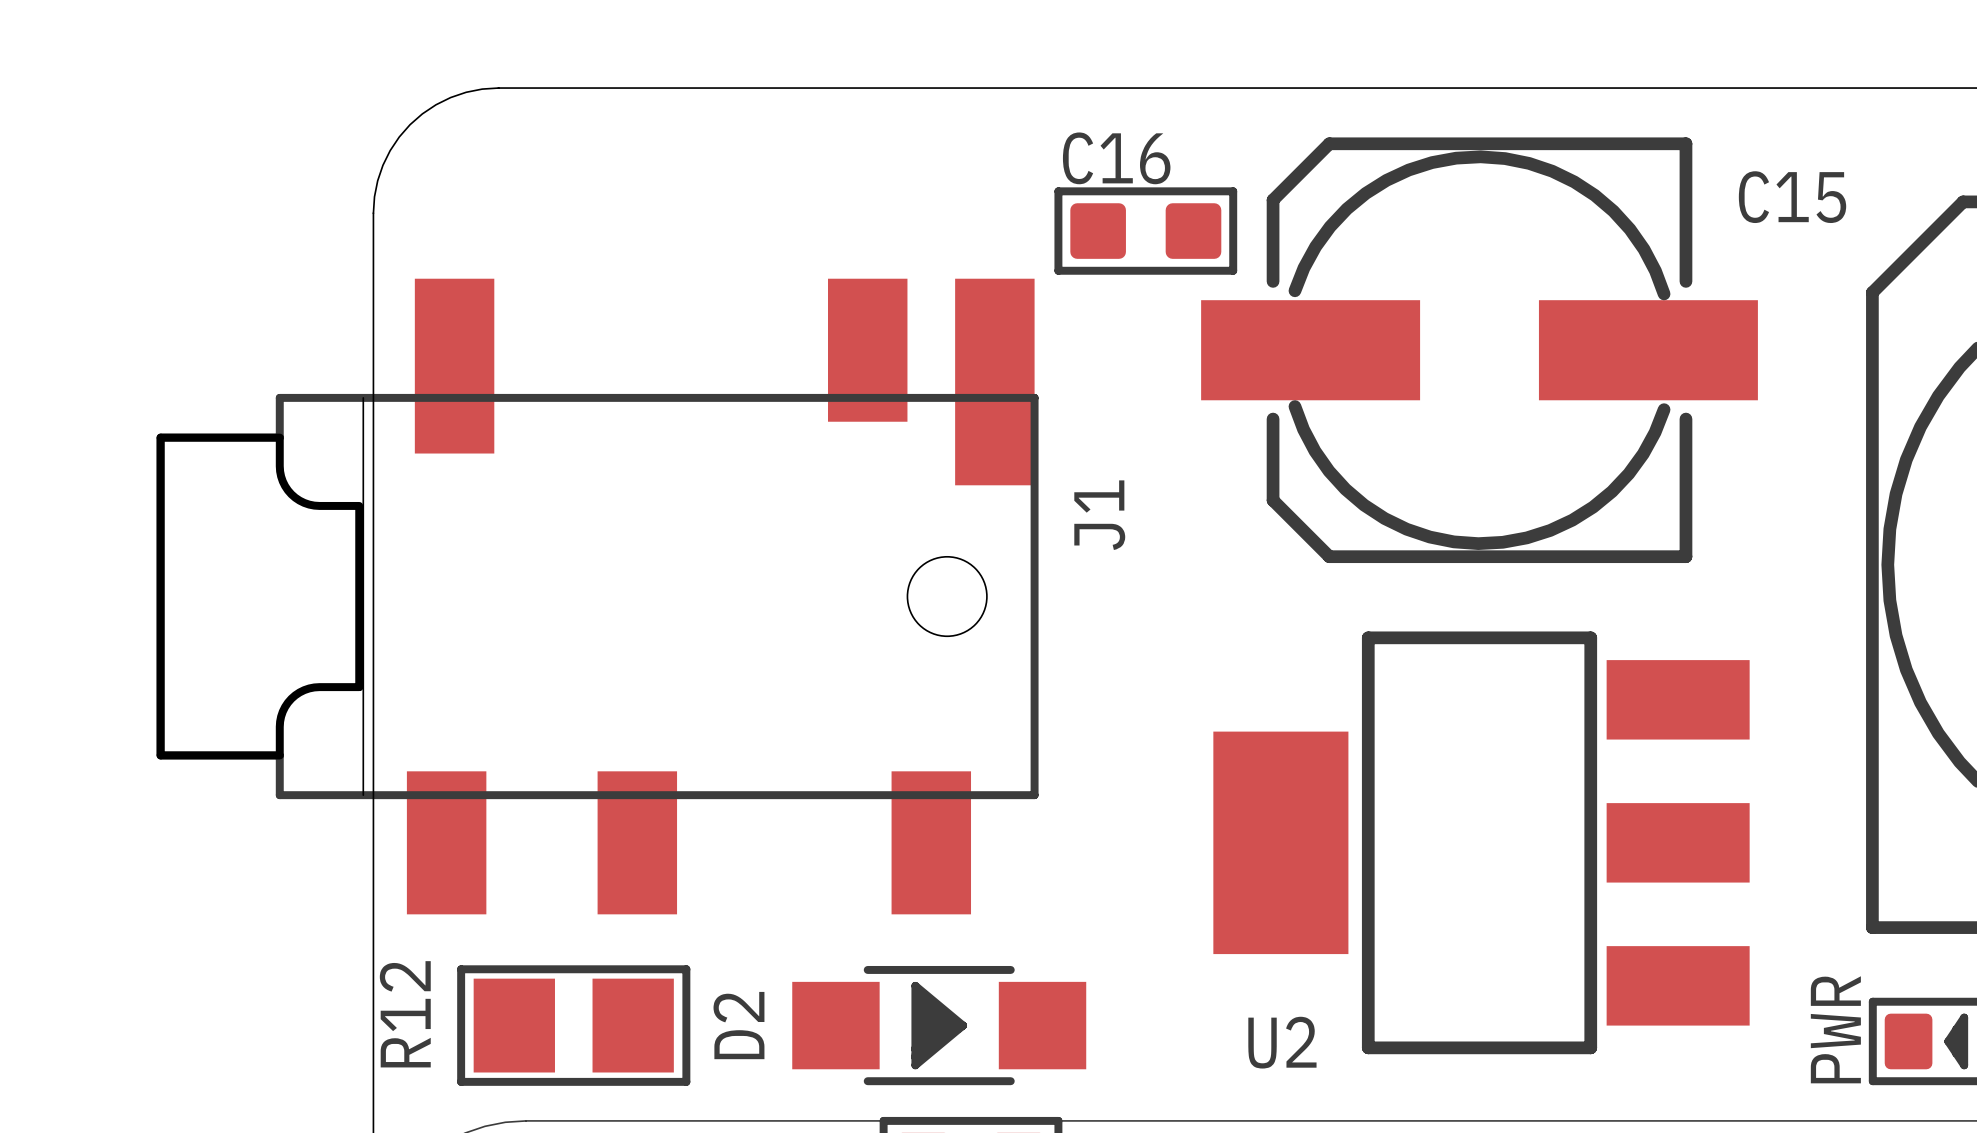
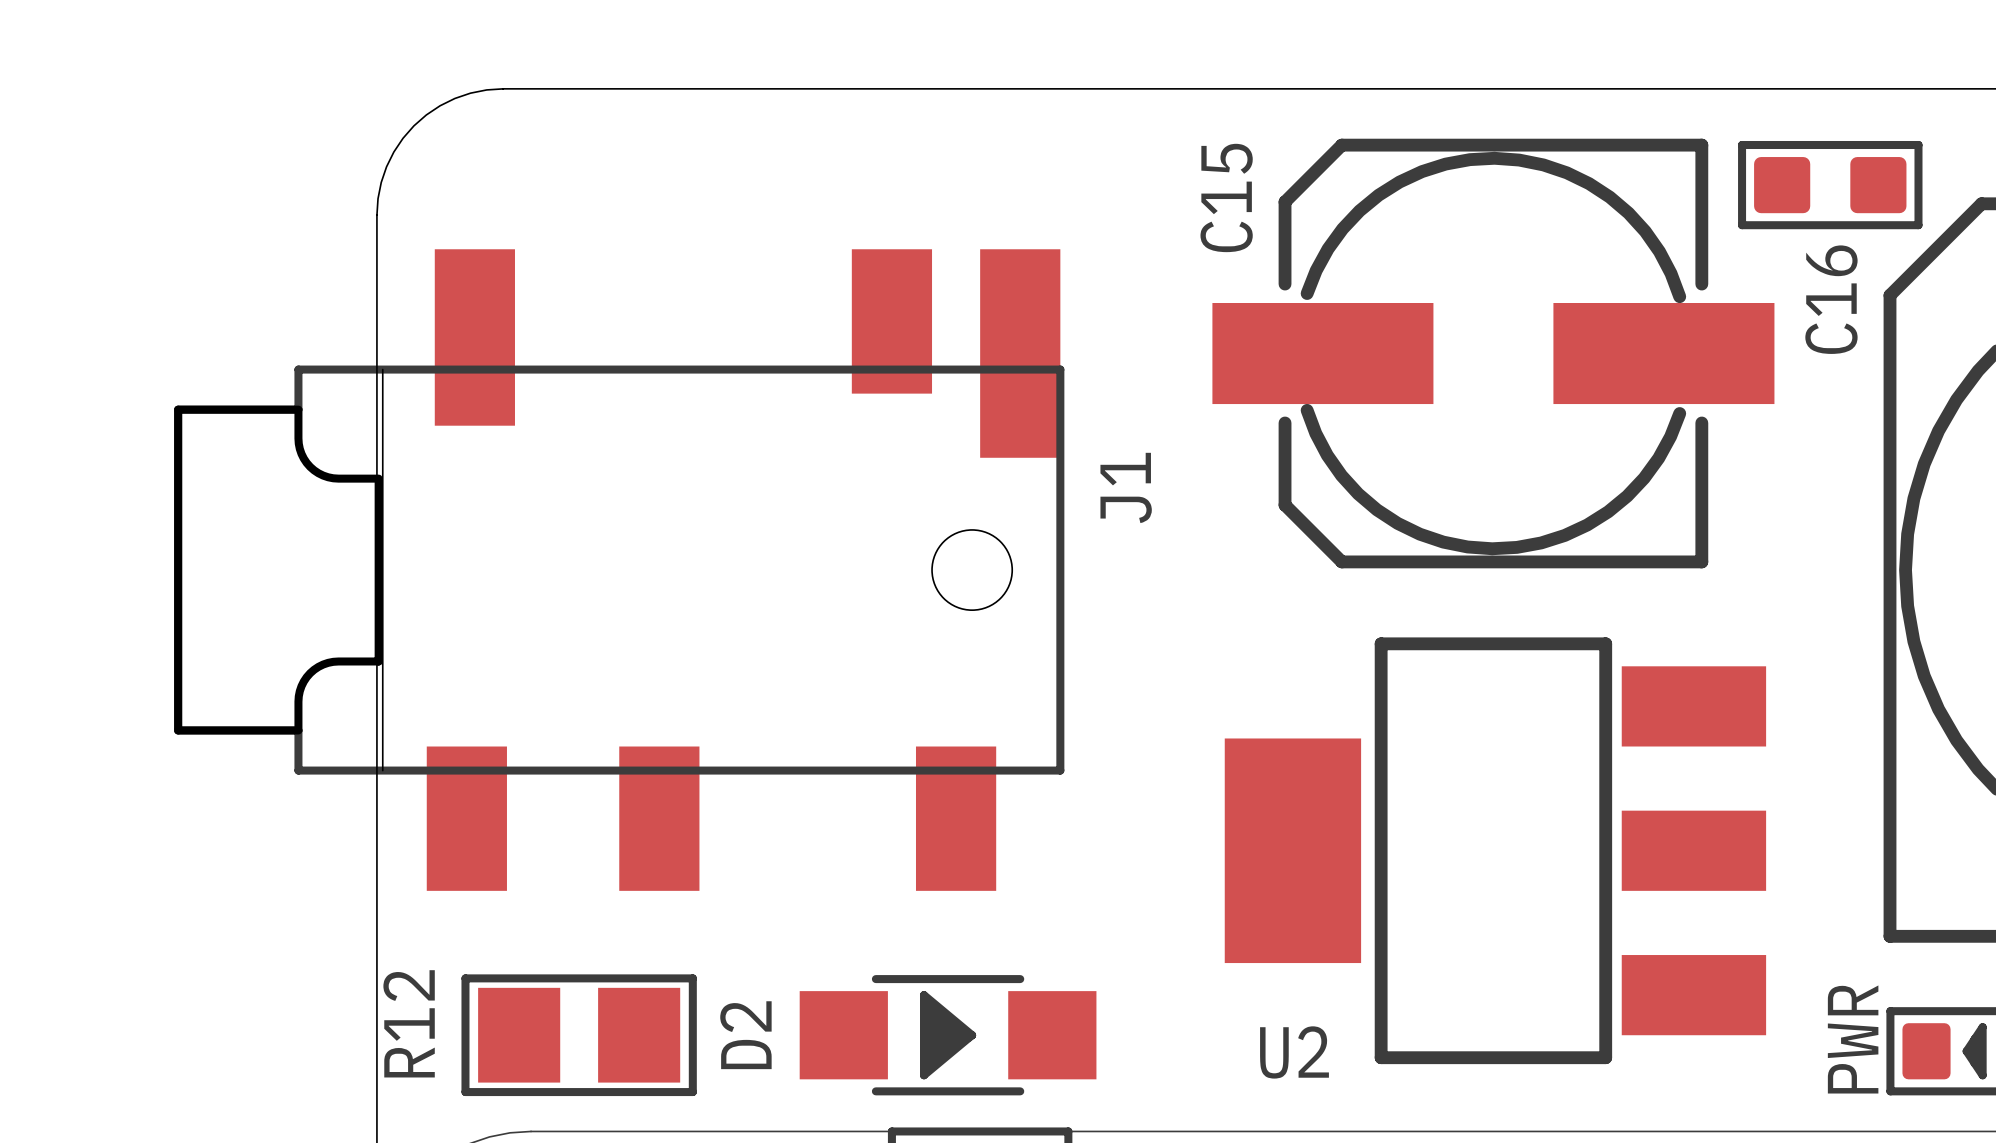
C16 name rotation: 0° (1116, 158) -> 90° counterclockwise (1831, 299)
C16 name position: C16 (1116, 158) -> C16 (1831, 299)
C15 name rotation: 0° (1792, 197) -> 90° counterclockwise (1226, 197)
C15 name position: C15 (1792, 197) -> C15 (1226, 197)
C16 position: (1145, 231) -> (1830, 185)
J1 position: (597, 596) -> (619, 570)

